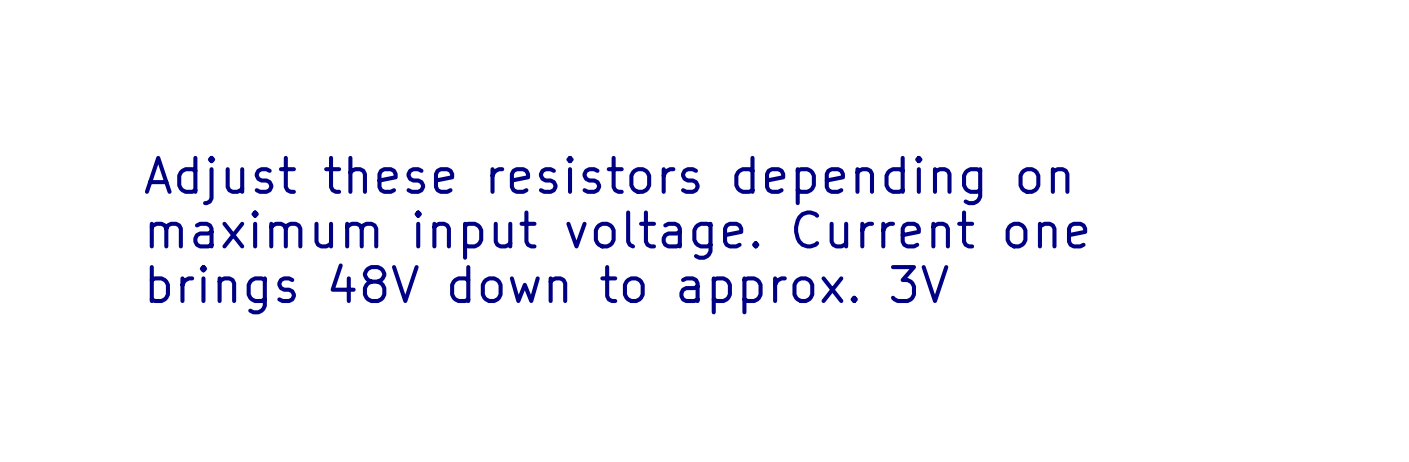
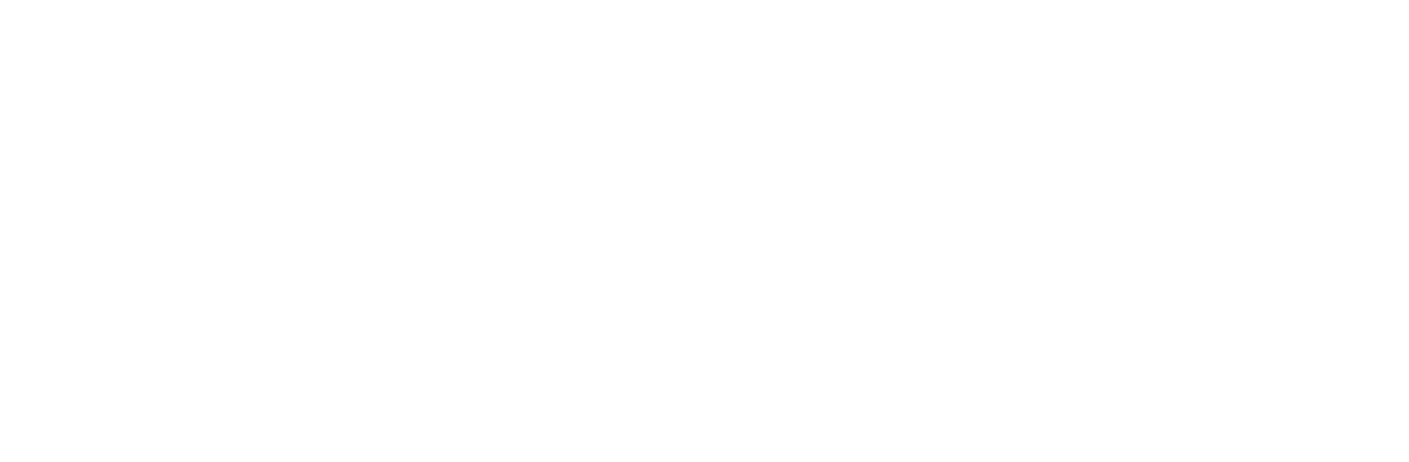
text: Adjust these resistors depending on (607, 180) -> none
text: maximum input voltage. Current one (618, 235) -> none
text: brings 48V down to approx. 3V (549, 288) -> none

